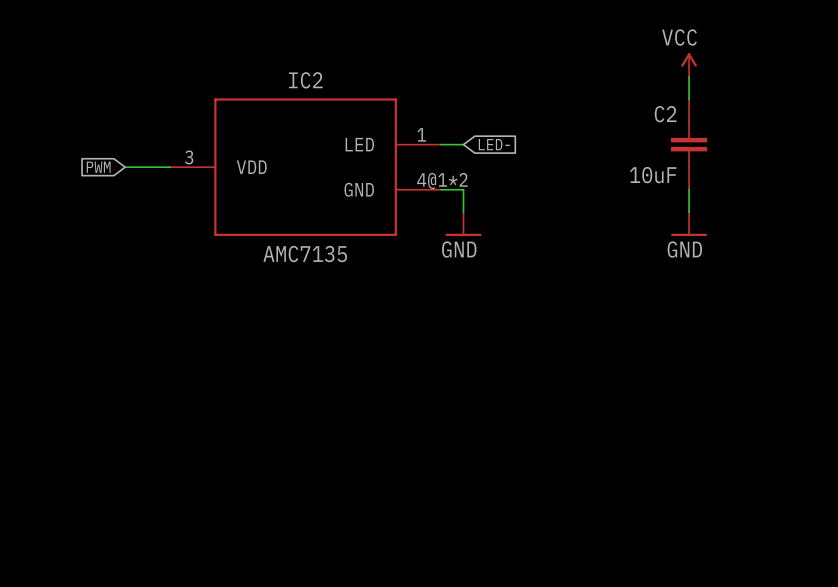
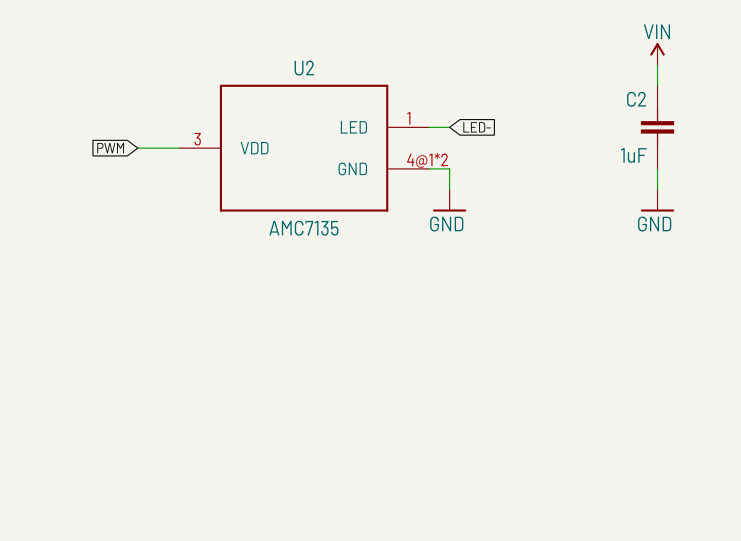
power symbol: VCC (689, 65) -> VIN (657, 54)
IC2 name: IC2 (305, 80) -> U2 (304, 68)
C2 value: 10uF (653, 175) -> 1uF (633, 155)

